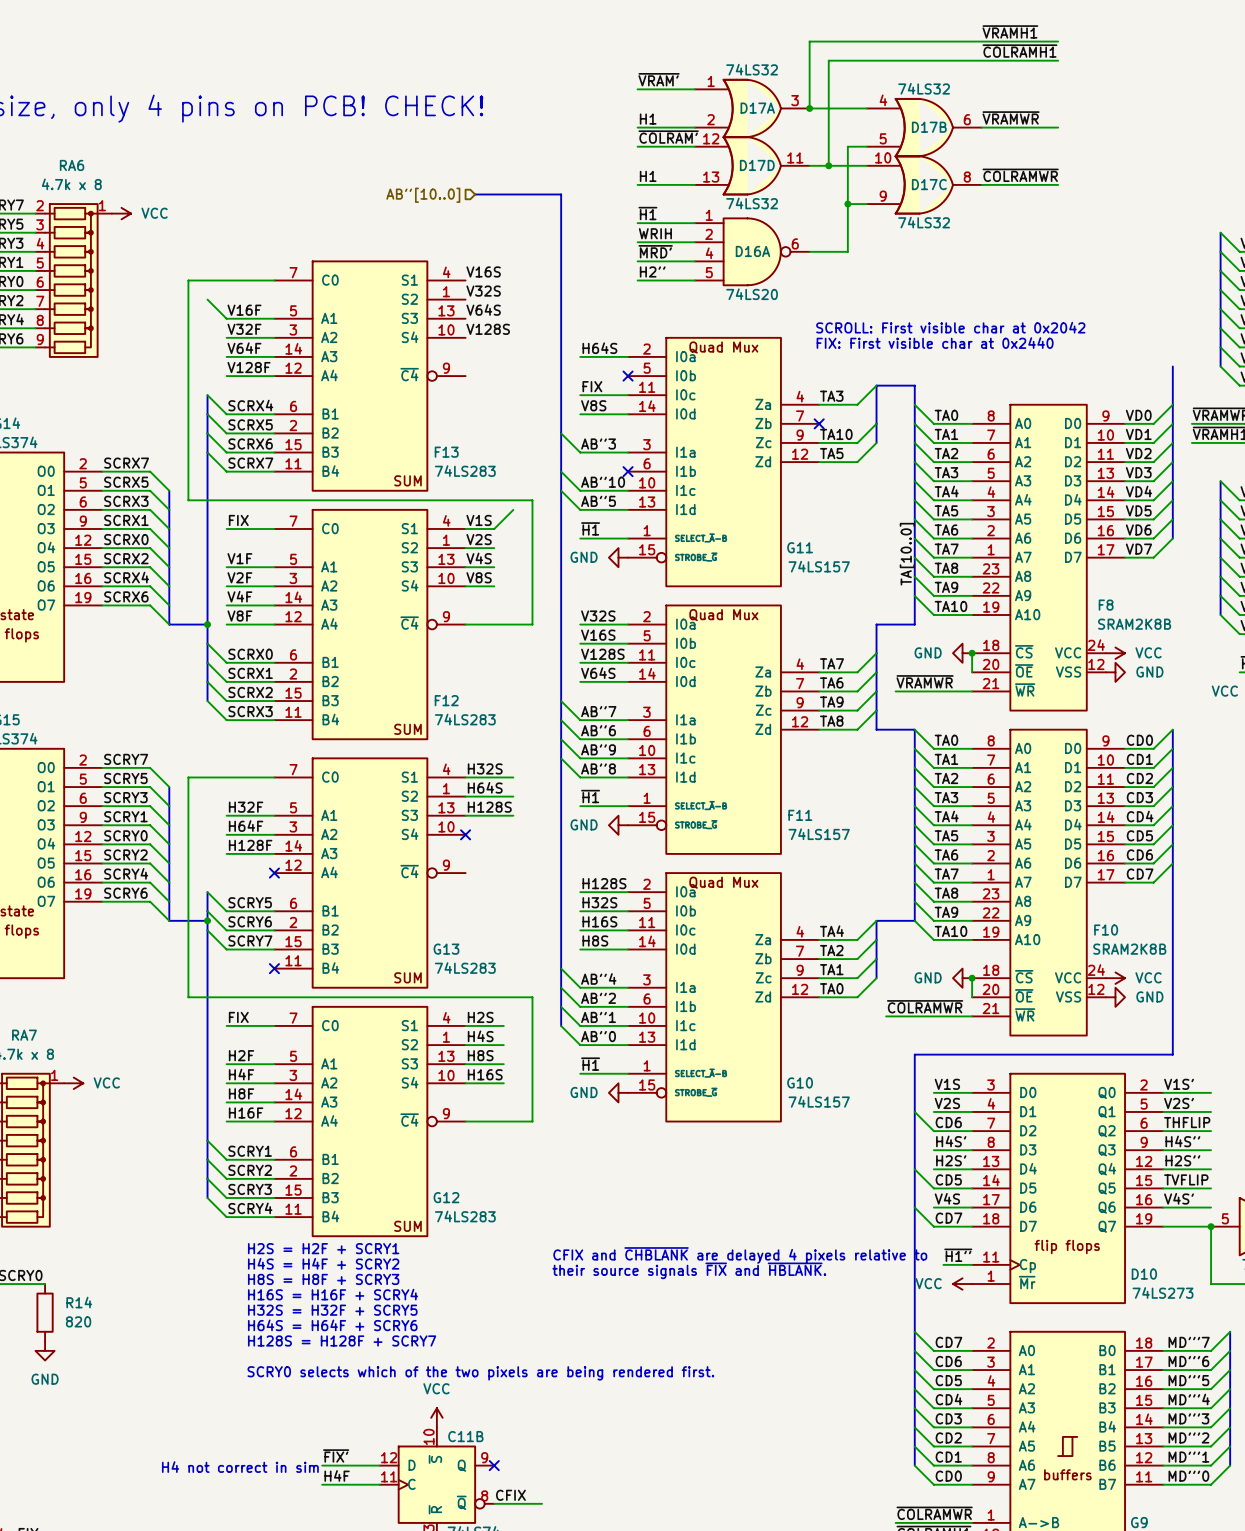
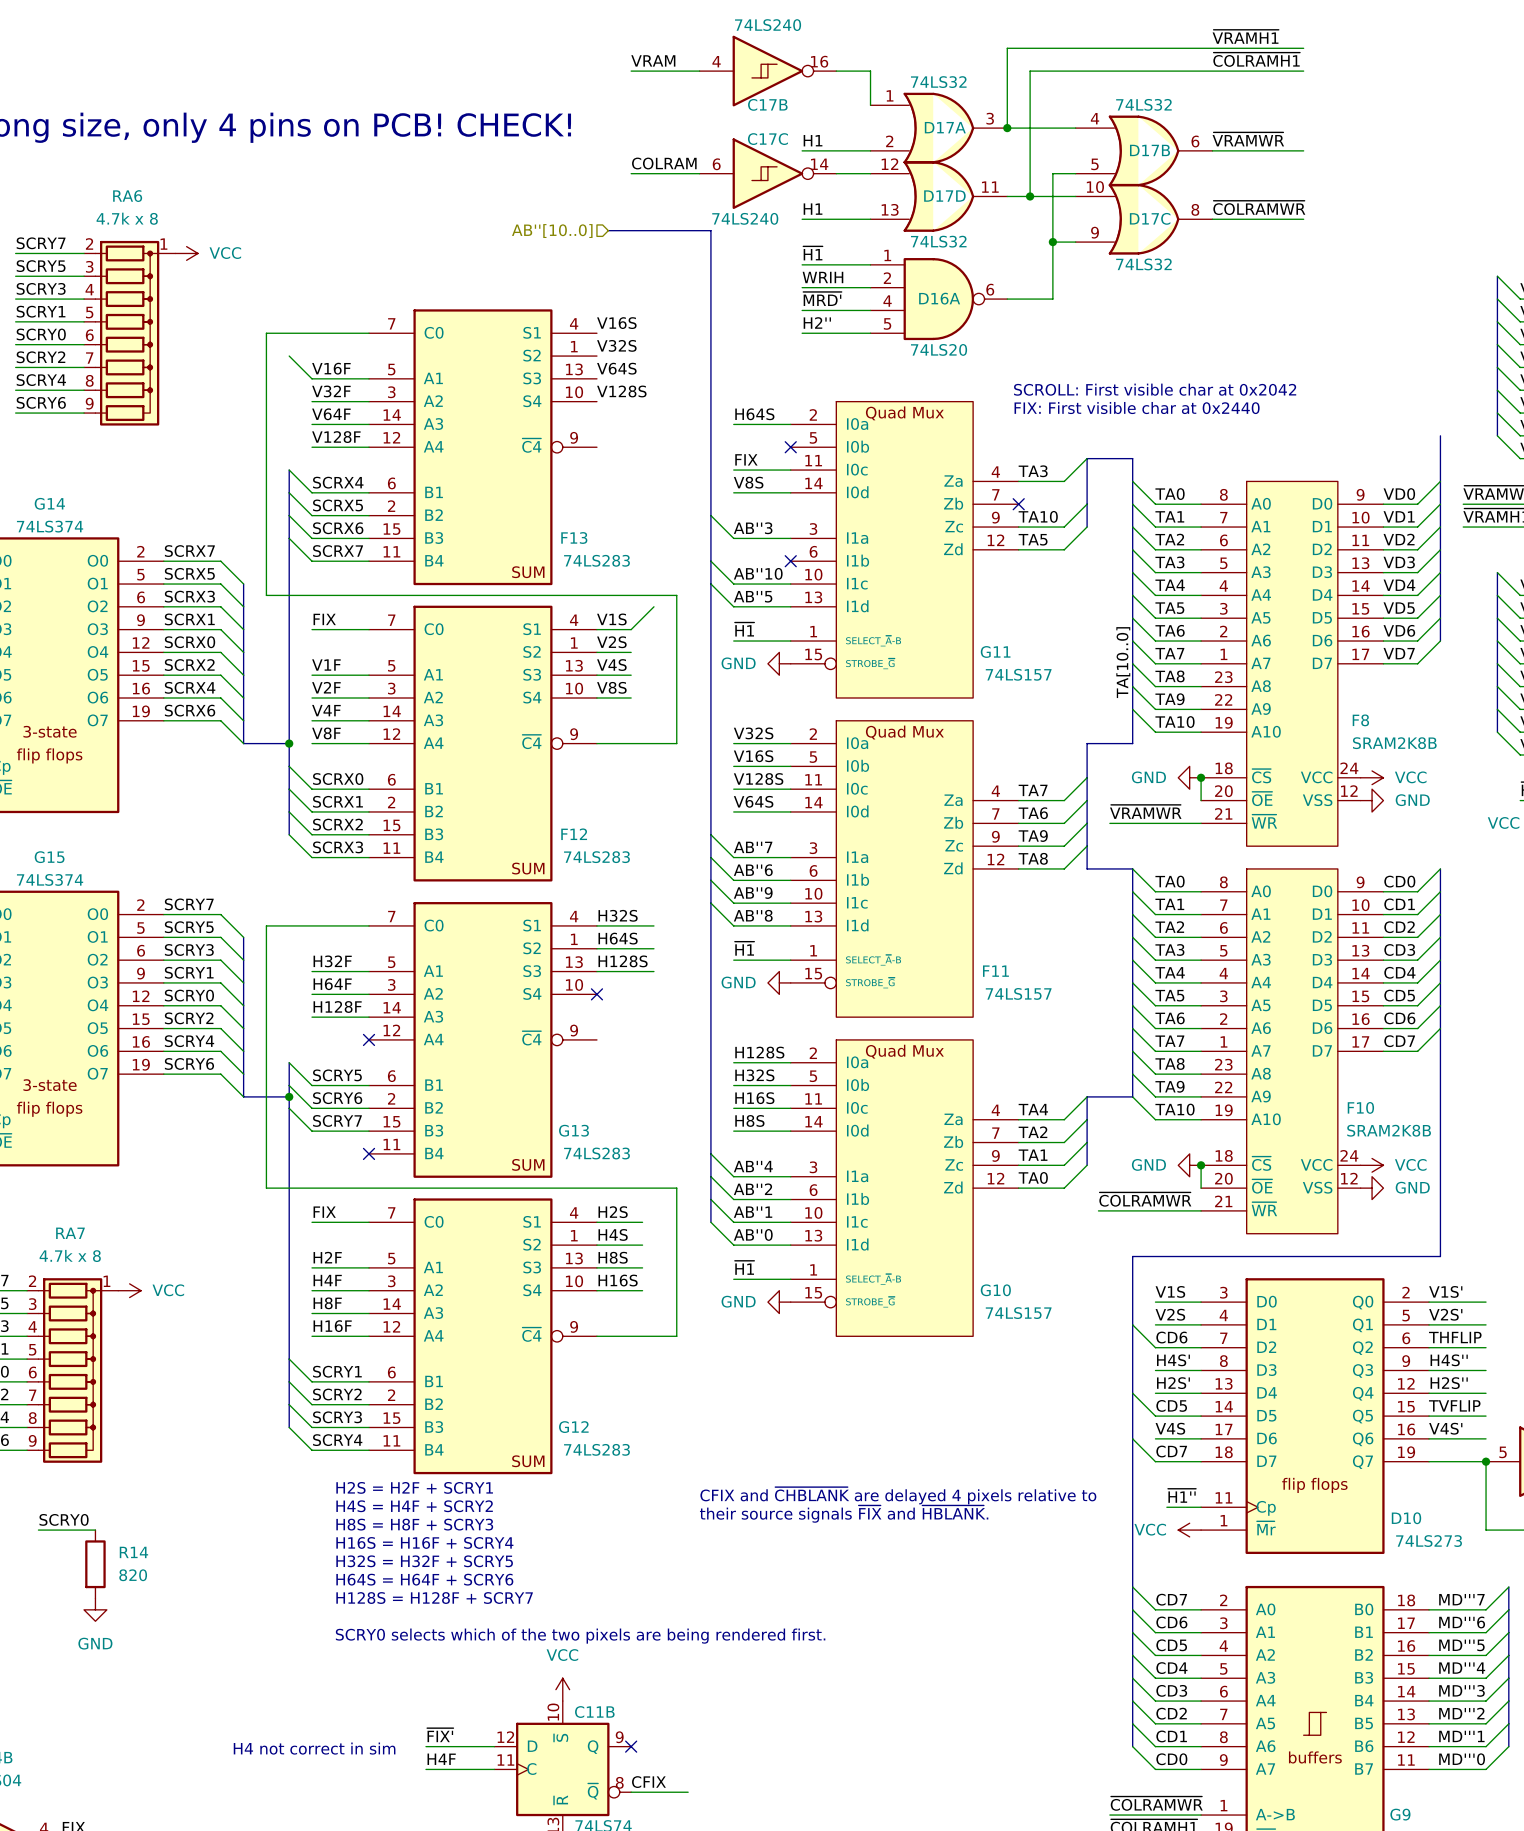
label: none -> VRAM (653, 60)
wire: none -> (631, 71) (699, 71)
C17B: none -> 74LS240 (767, 71)
label: ~{VRAM'} (659, 79) -> none
wire: (637, 89) (694, 89) -> (836, 71) (870, 71) (870, 105)
label: ~{COLRAM'} (668, 137) -> none
label: none -> COLRAM (664, 163)
wire: none -> (631, 173) (699, 173)
C17C: none -> 74LS240 (767, 173)

